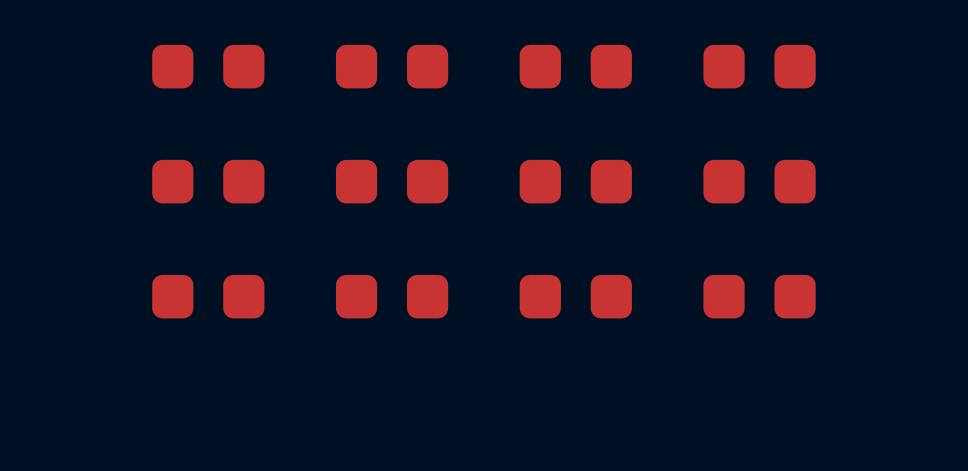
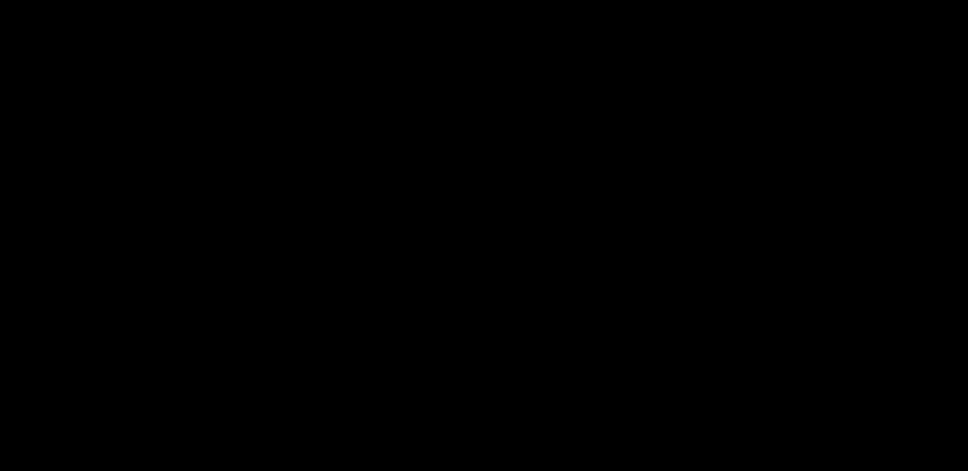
part: (208, 66) -> none
part: (392, 66) -> none
part: (575, 66) -> none
part: (759, 66) -> none
part: (208, 181) -> none
part: (392, 181) -> none
part: (575, 181) -> none
part: (759, 181) -> none
part: (208, 296) -> none
part: (392, 296) -> none
part: (575, 296) -> none
part: (759, 296) -> none

